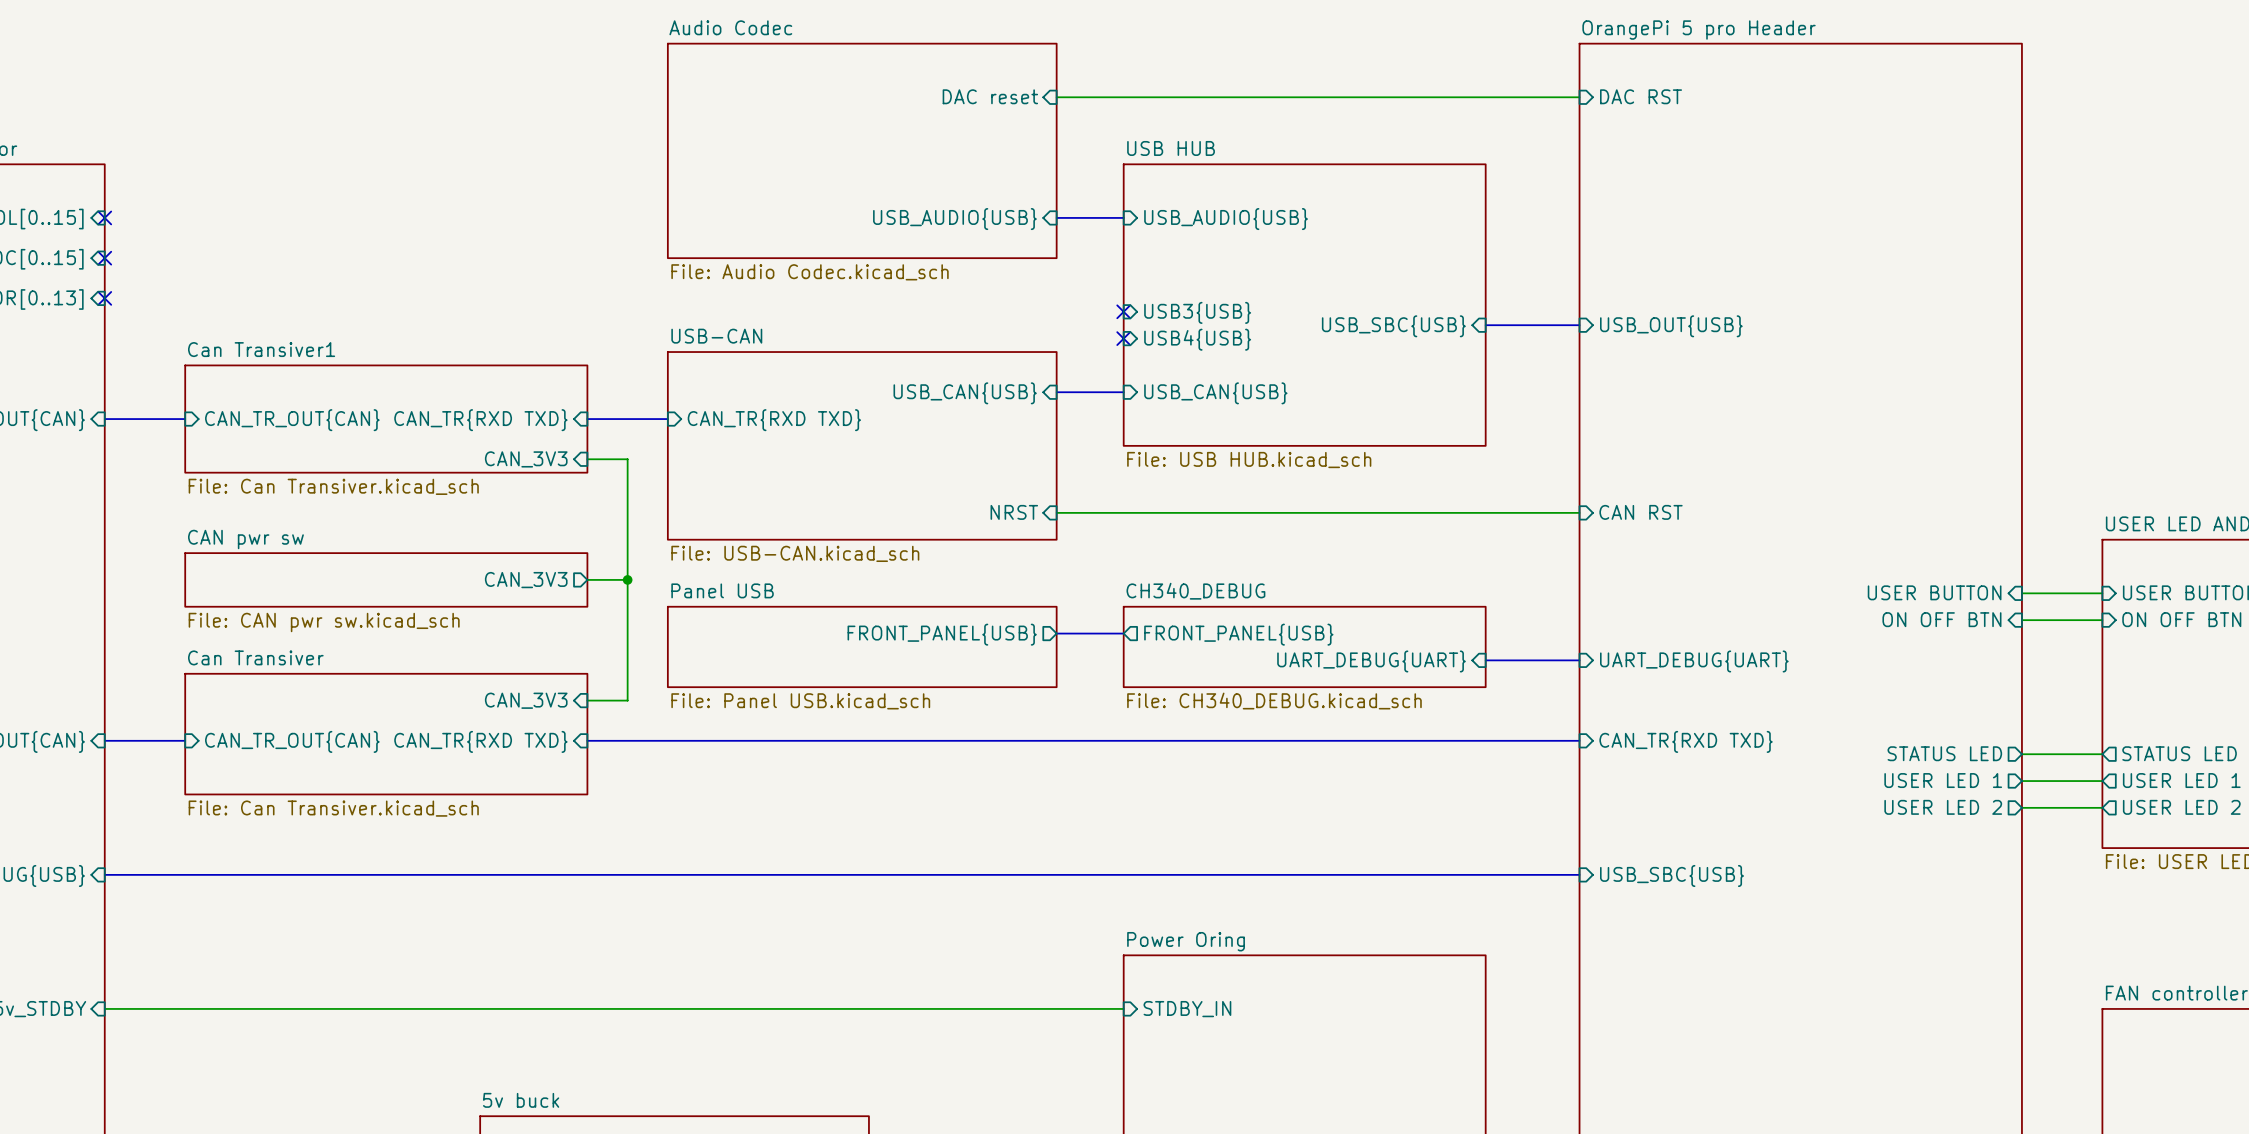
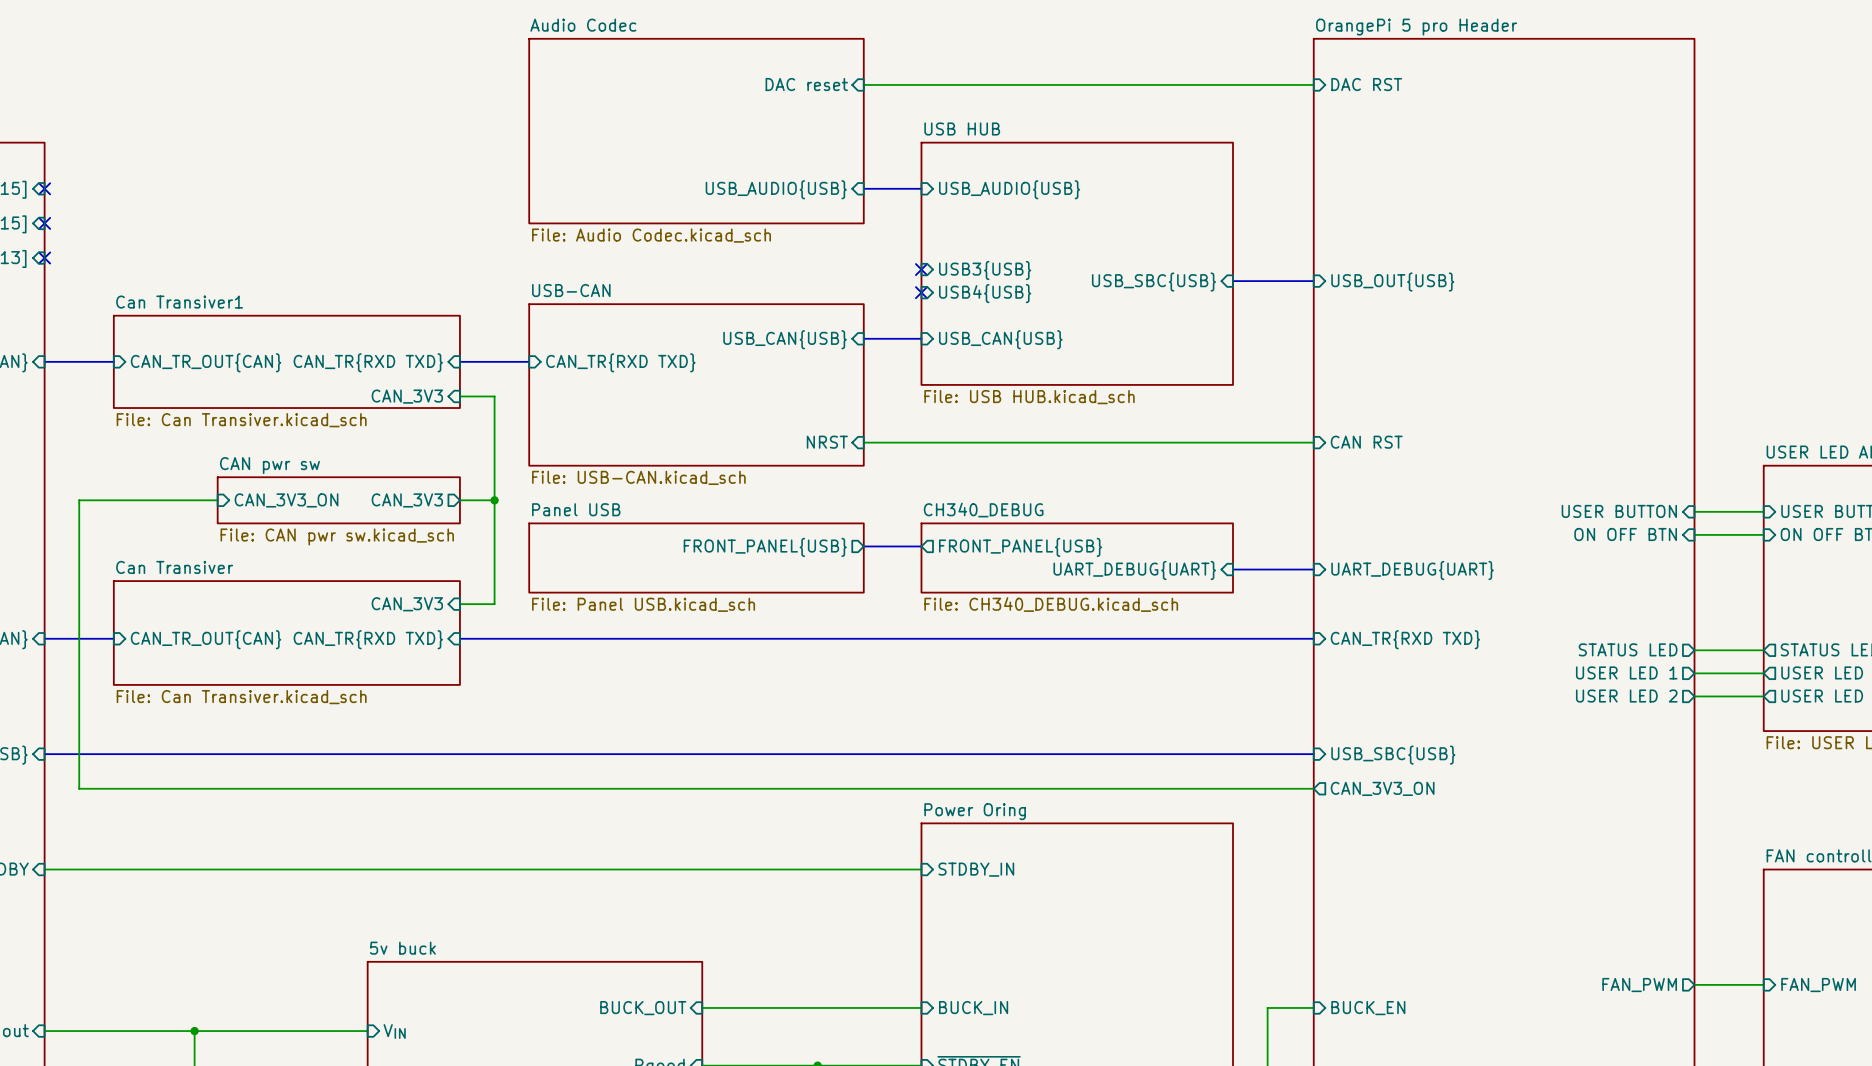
wire: none -> (217, 500) (79, 500) (79, 788) (1313, 788)
sheet CAN pwr sw: File: CAN pwr sw.kicad_sch (386, 579) -> none
sheet CAN pwr sw: none -> File: CAN pwr sw.kicad_sch (338, 500)
sheet pin: none -> CAN_3V3_ON (286, 500)
sheet pin: none -> CAN_3V3_ON (1382, 788)

